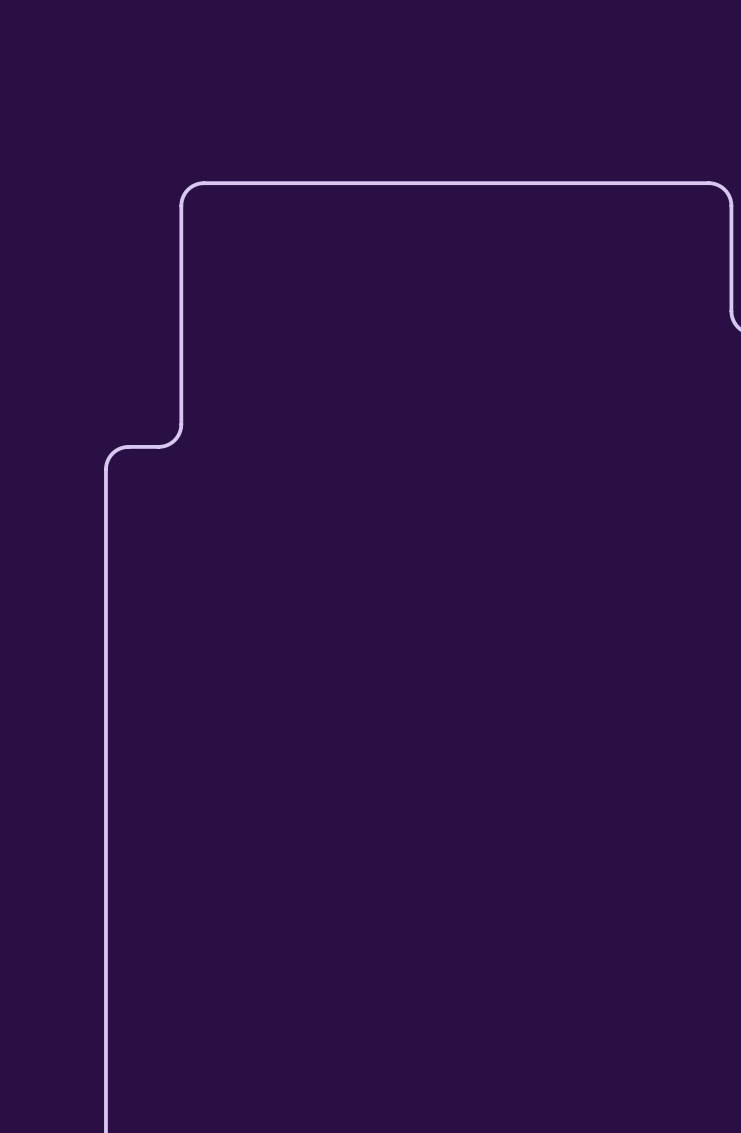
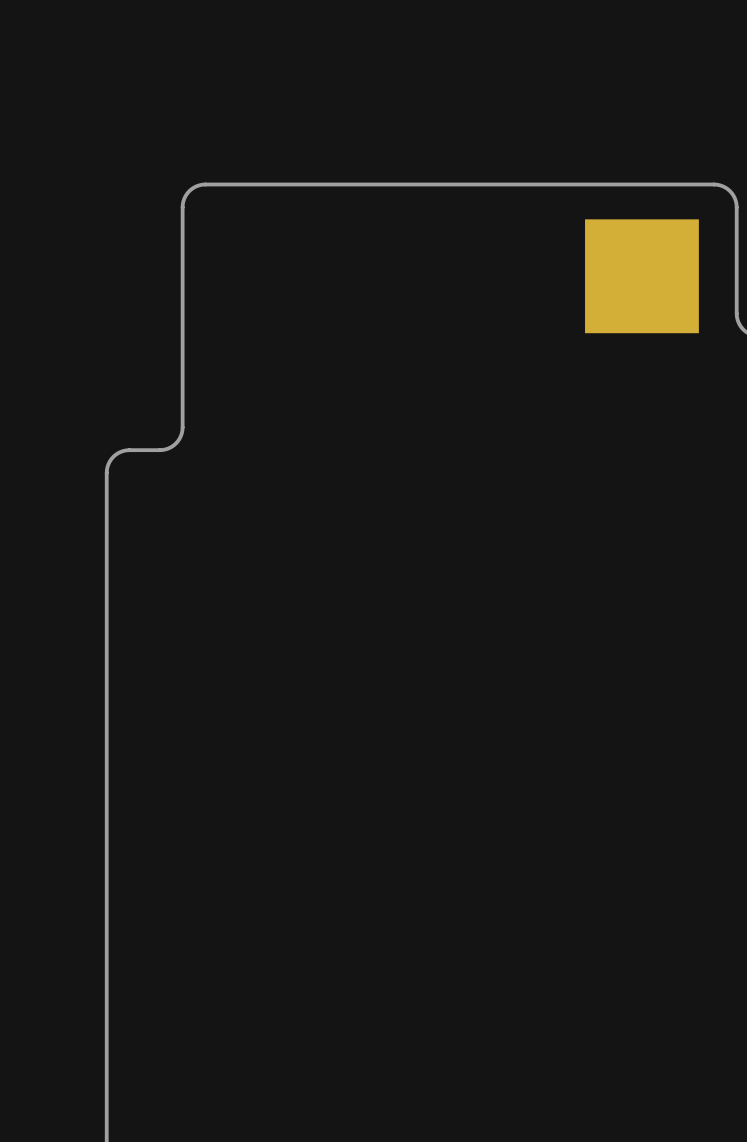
part: none -> (641, 276)

